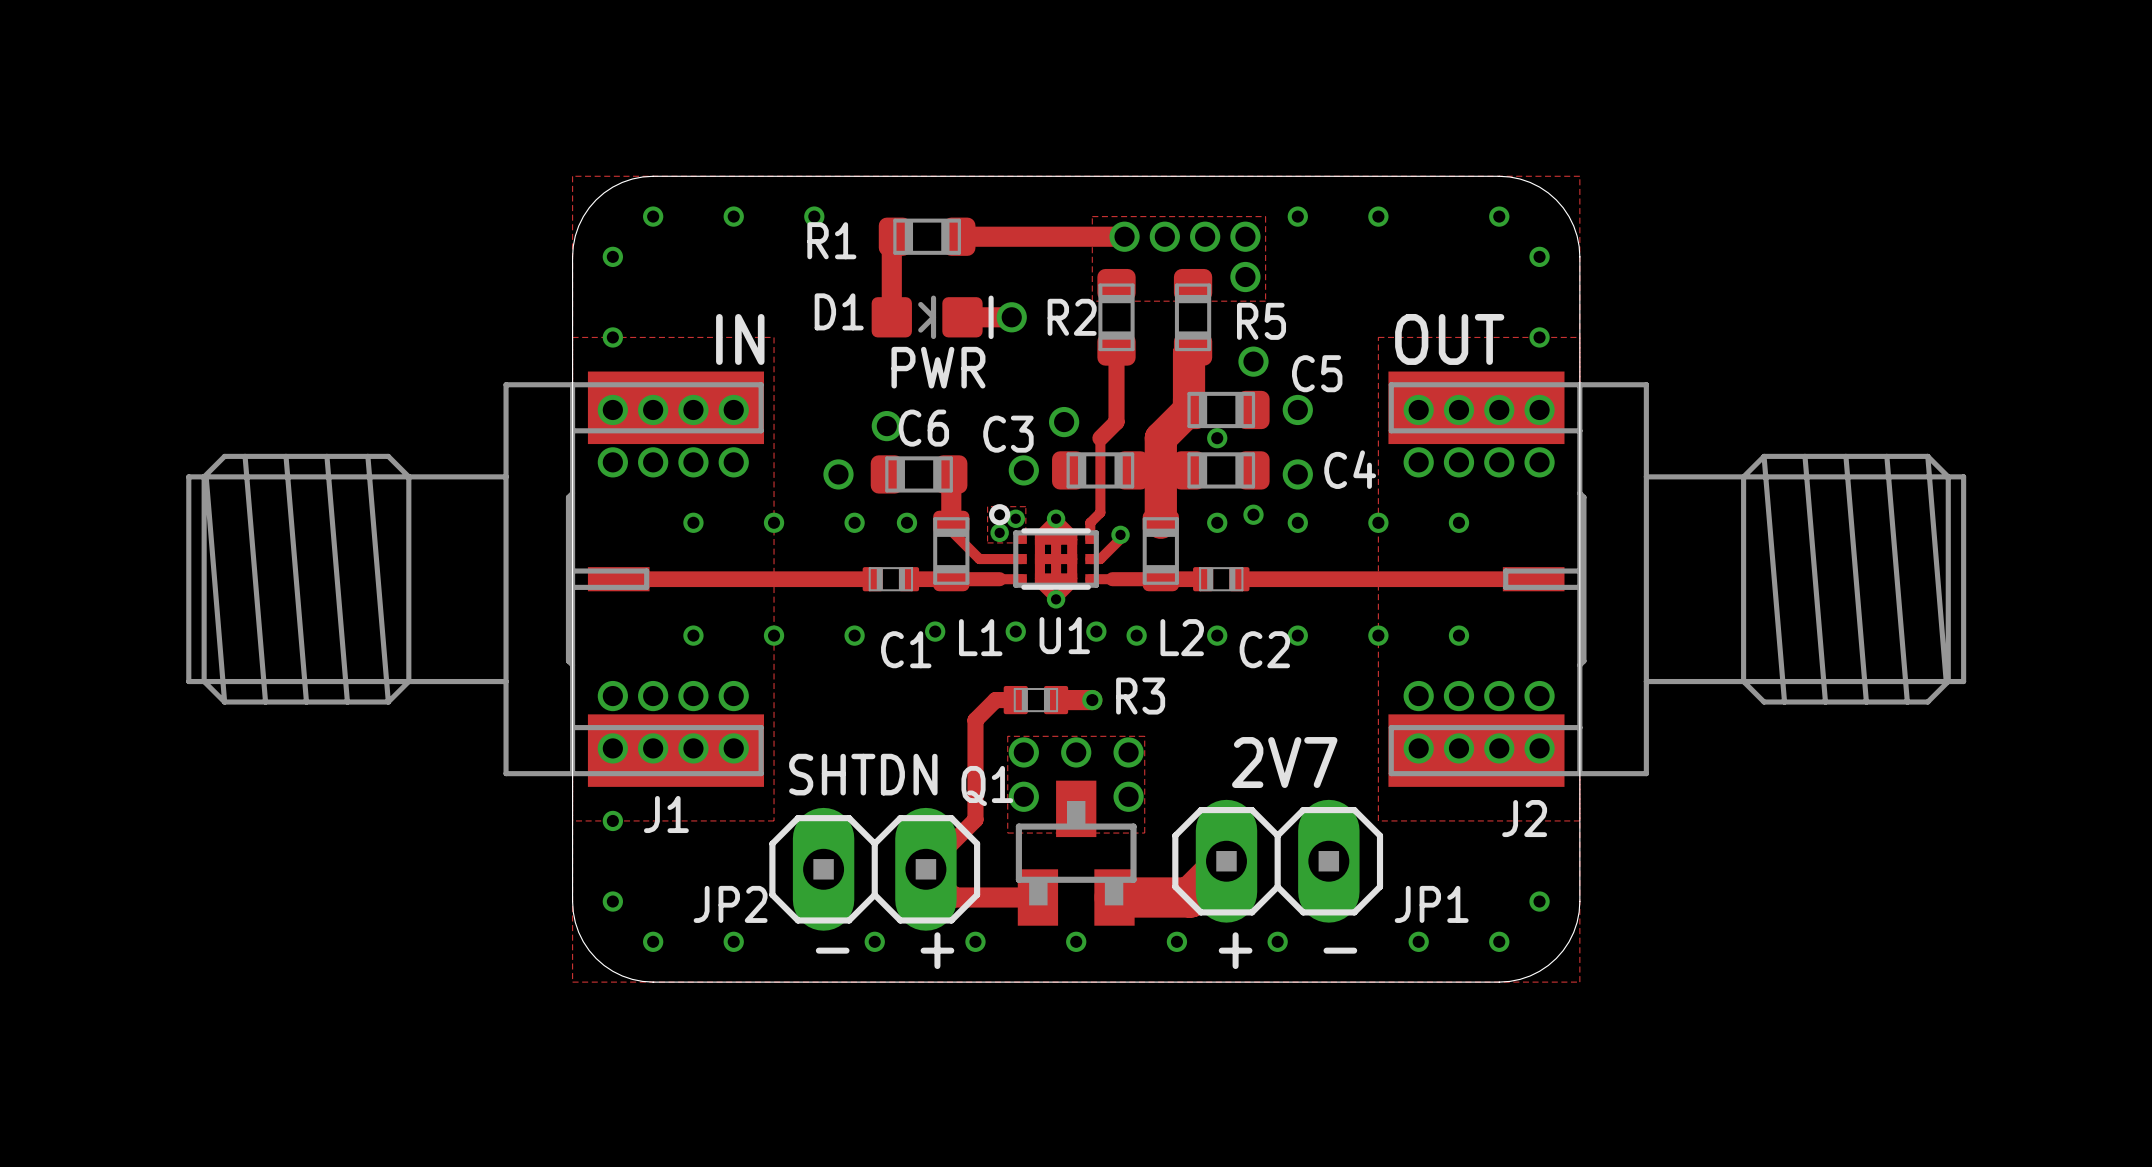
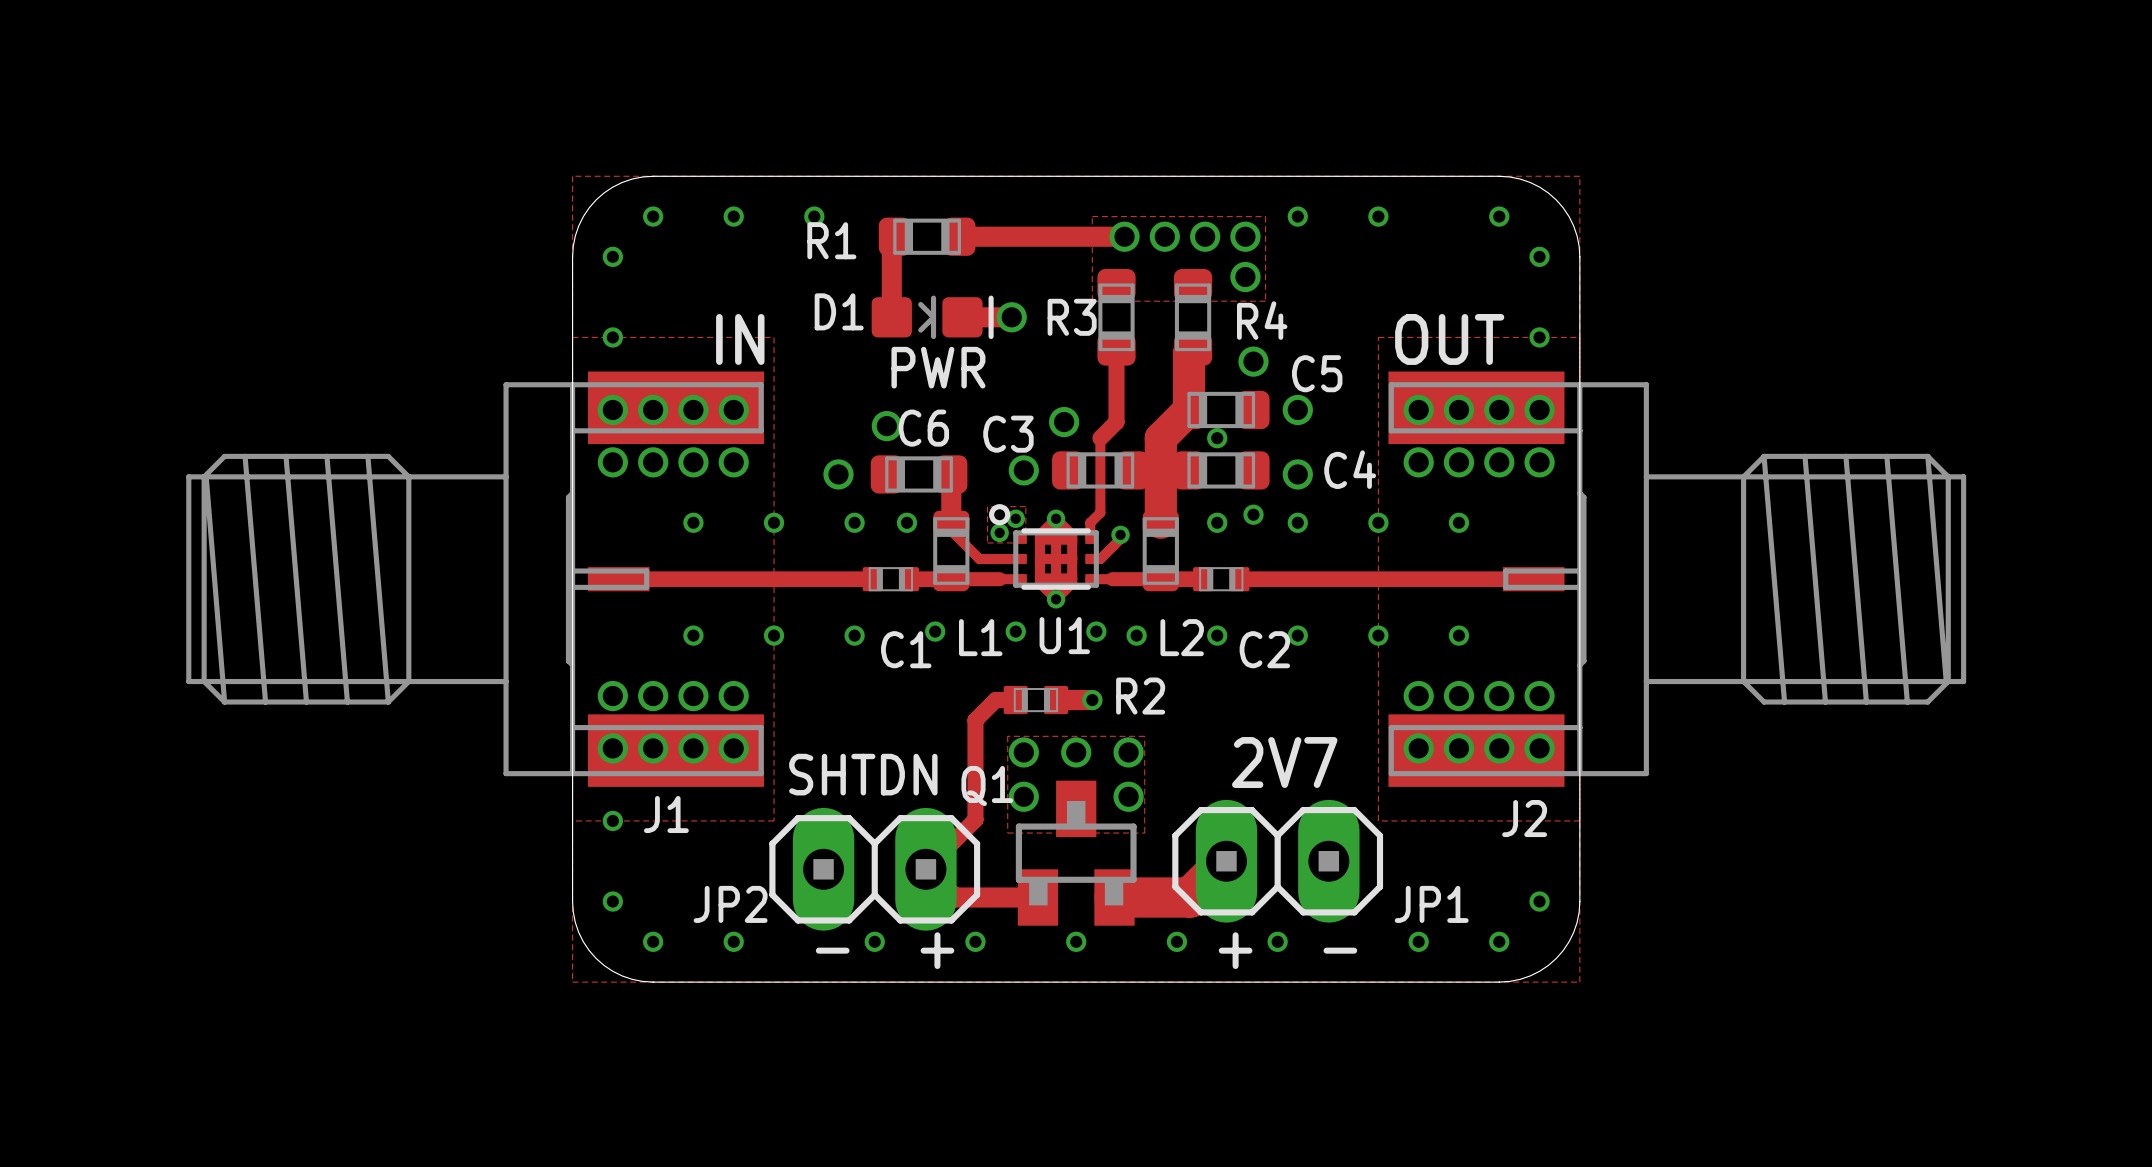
R2 name: R2 (1072, 317) -> R3 (1072, 317)
R5 name: R5 (1261, 321) -> R4 (1262, 320)
R3 name: R3 (1140, 696) -> R2 (1140, 696)

